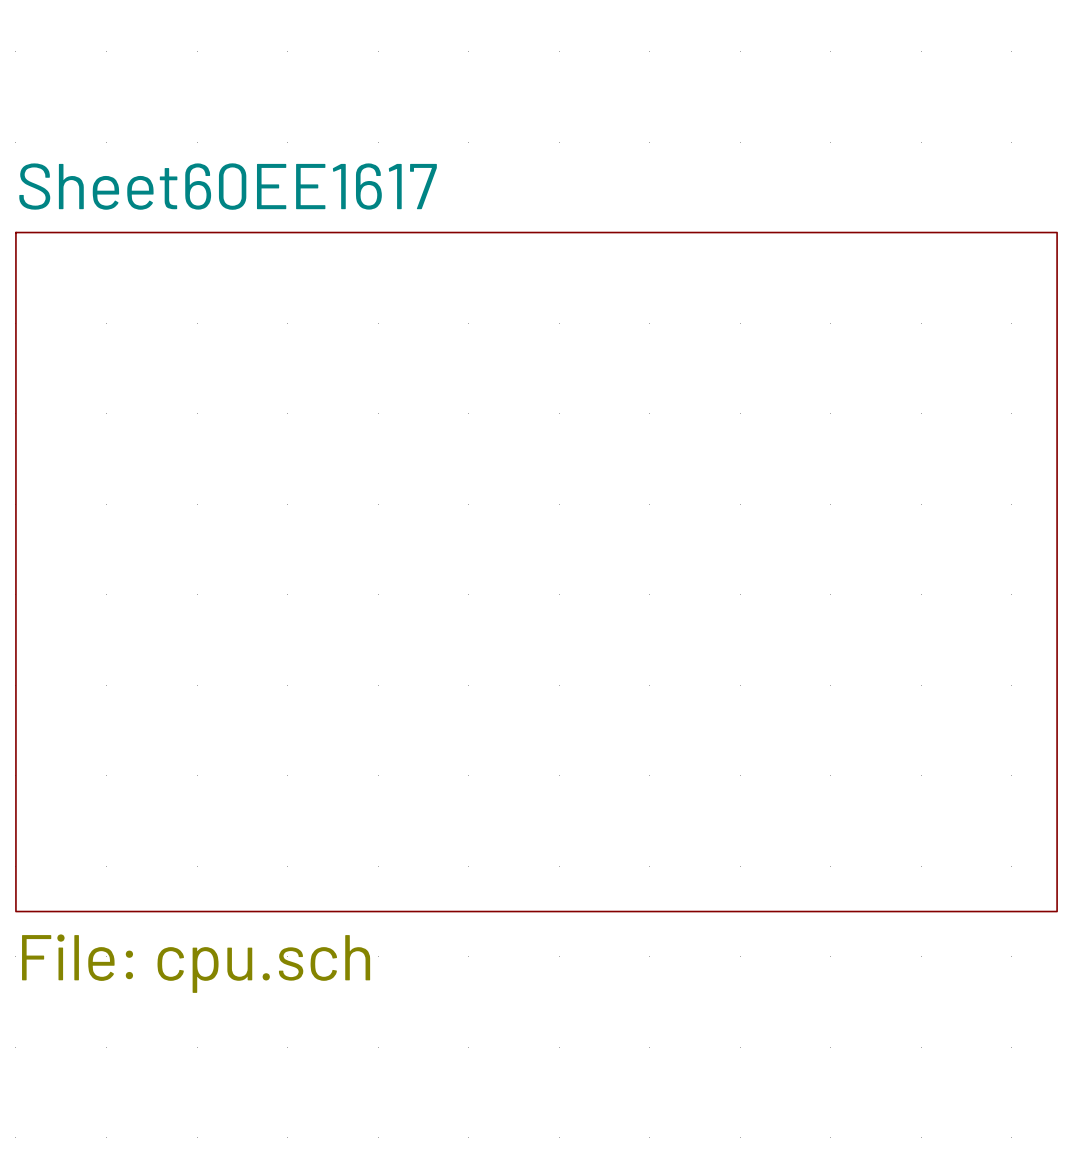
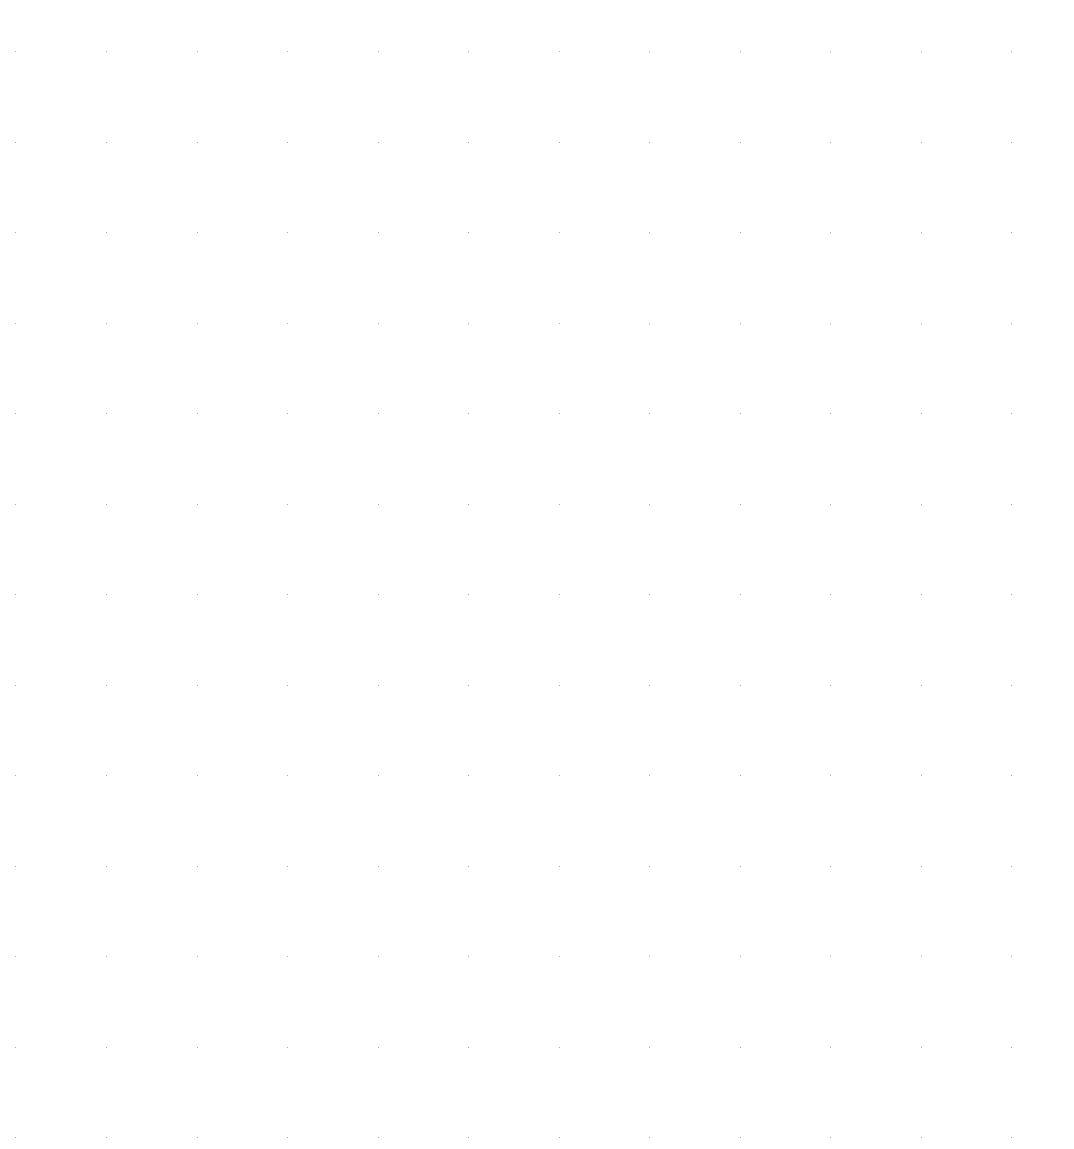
sheet Sheet60EE1617: File: cpu.sch (536, 572) -> none

